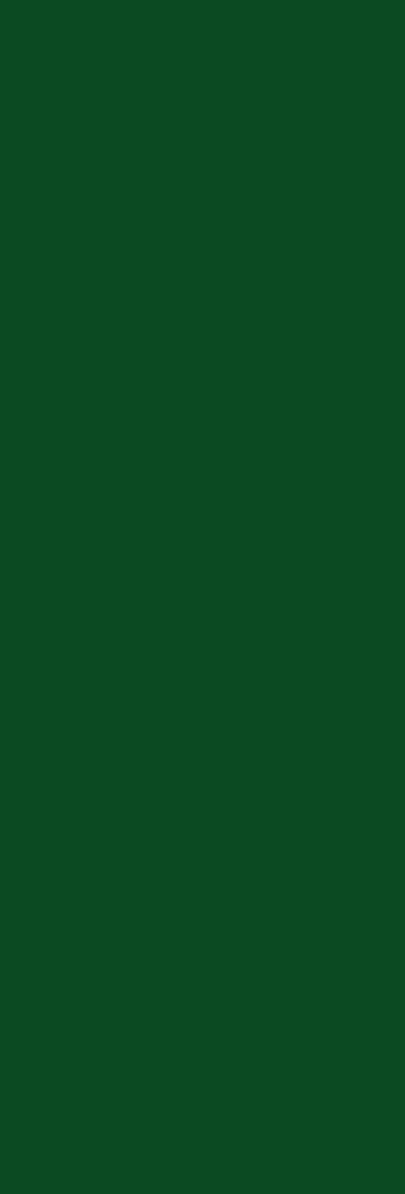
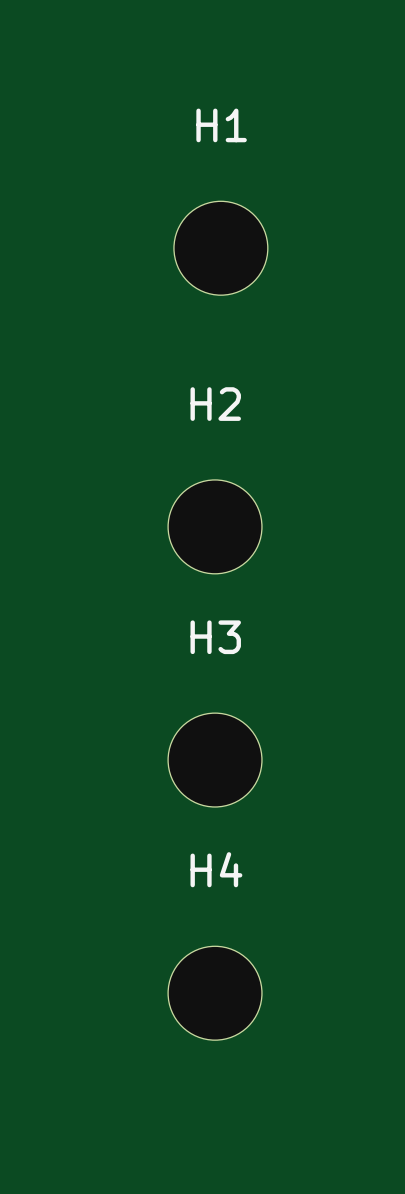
H1: none -> (220, 248)
H2: none -> (215, 526)
H3: none -> (215, 760)
H4: none -> (215, 993)

